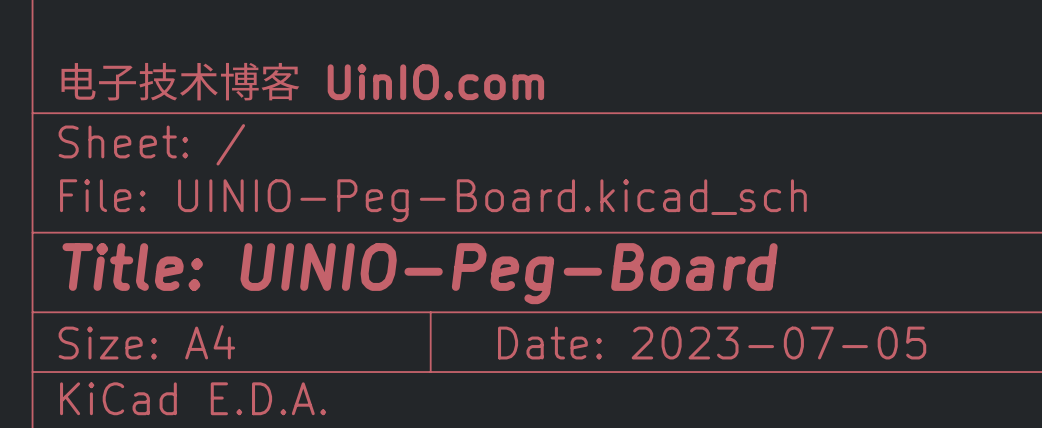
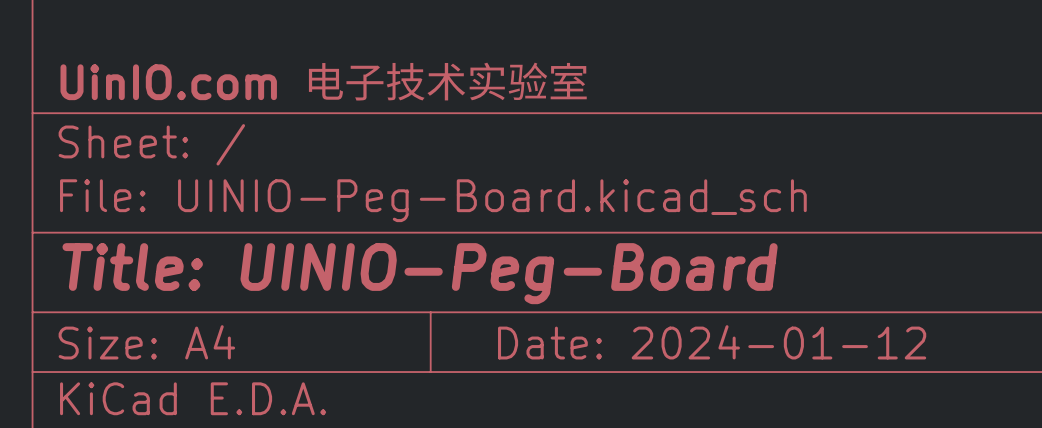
title block: 电子技术博客 UinIO.com (301, 81) -> UinIO.com 电子技术实验室 (325, 81)
title block: Date: 2023-07-05 (712, 343) -> Date: 2024-01-12 (712, 342)

